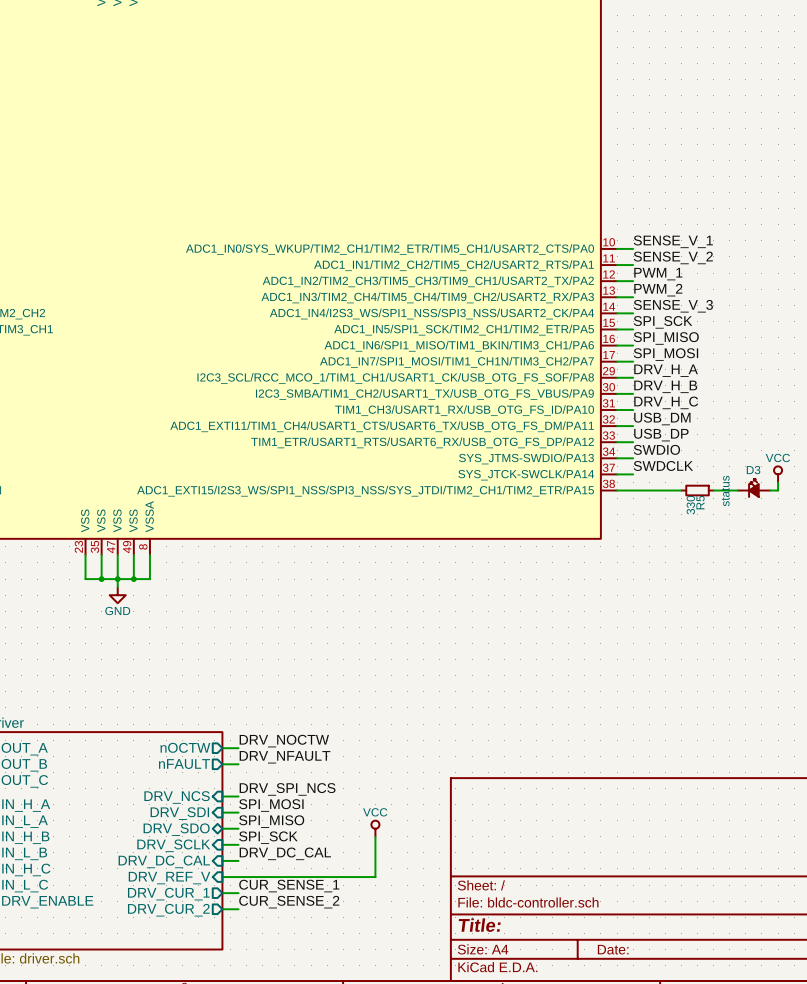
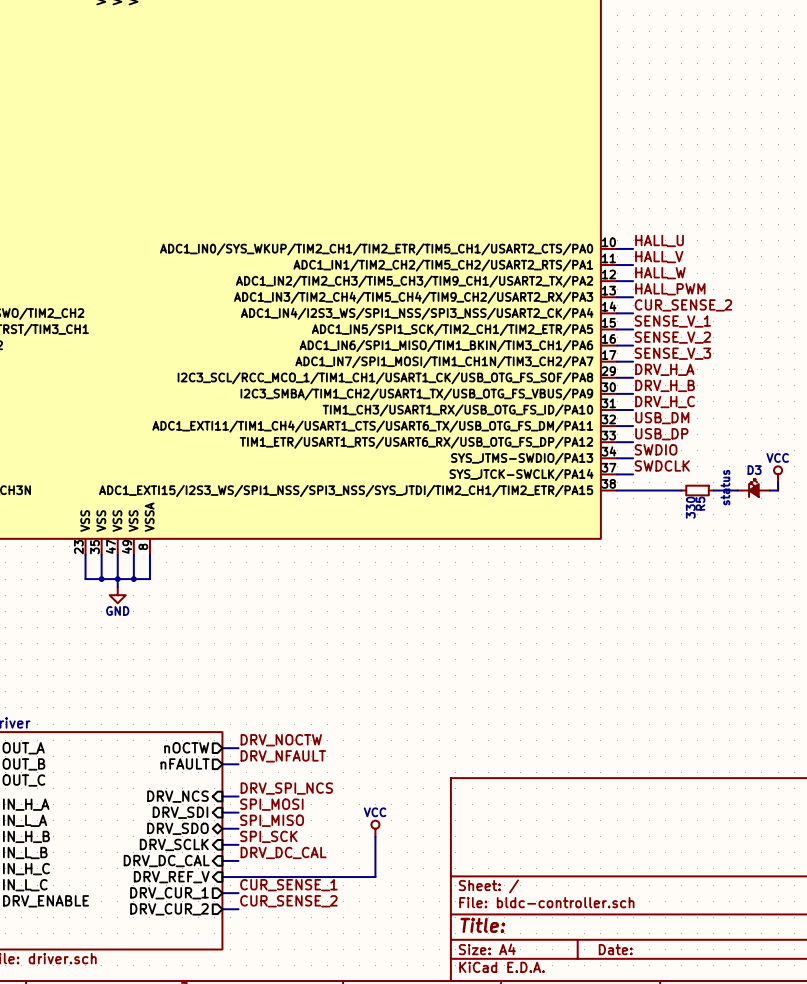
label: SENSE_V_1 (673, 241) -> HALL_U (659, 240)
label: SENSE_V_2 (673, 257) -> HALL_V (659, 257)
label: PWM_1 (658, 274) -> HALL_W (660, 273)
label: PWM_2 (658, 290) -> HALL_PWM (670, 289)
label: SENSE_V_3 (673, 306) -> CUR_SENSE_2 (683, 305)
label: SPI_SCK (663, 322) -> SENSE_V_1 (672, 321)
label: SPI_MISO (666, 338) -> SENSE_V_2 (672, 337)
label: SPI_MOSI (665, 354) -> SENSE_V_3 (672, 353)

